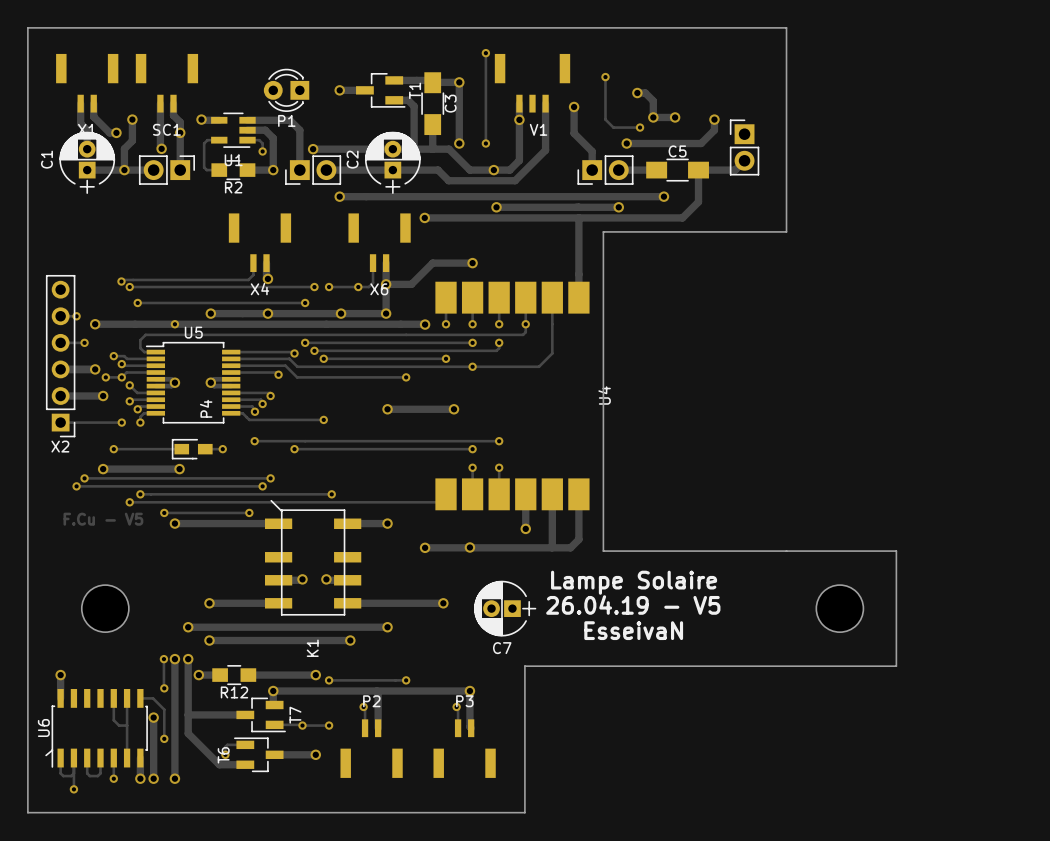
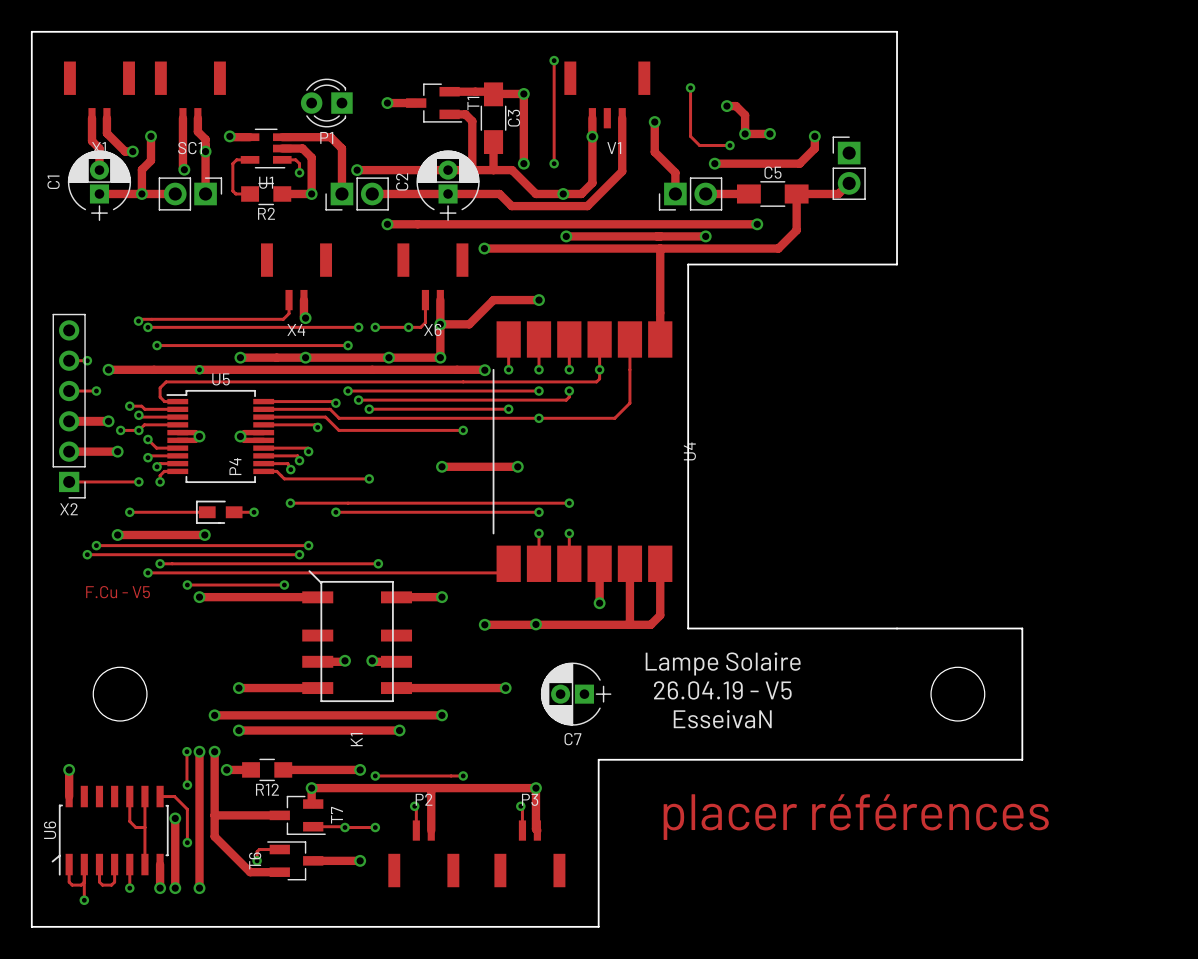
U4 footprint: [435, 281, 590, 511] -> [492, 321, 673, 582]
text: none -> placer références (856, 817)

